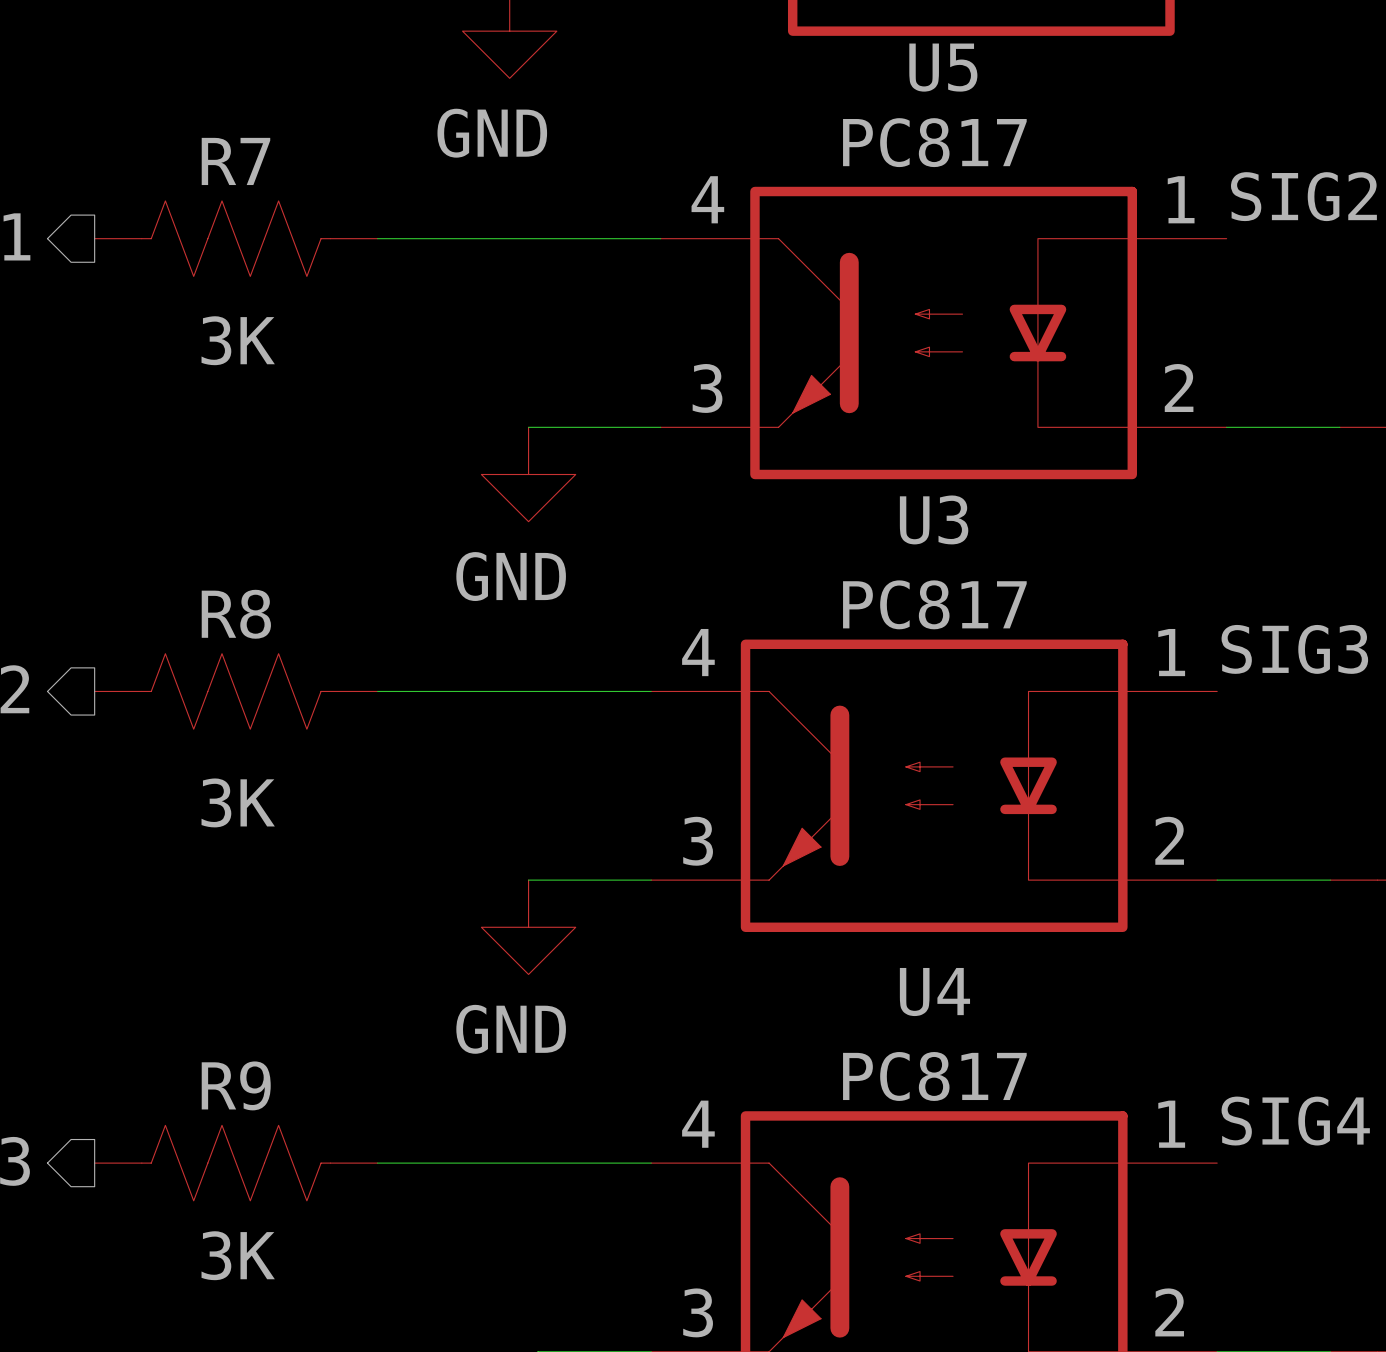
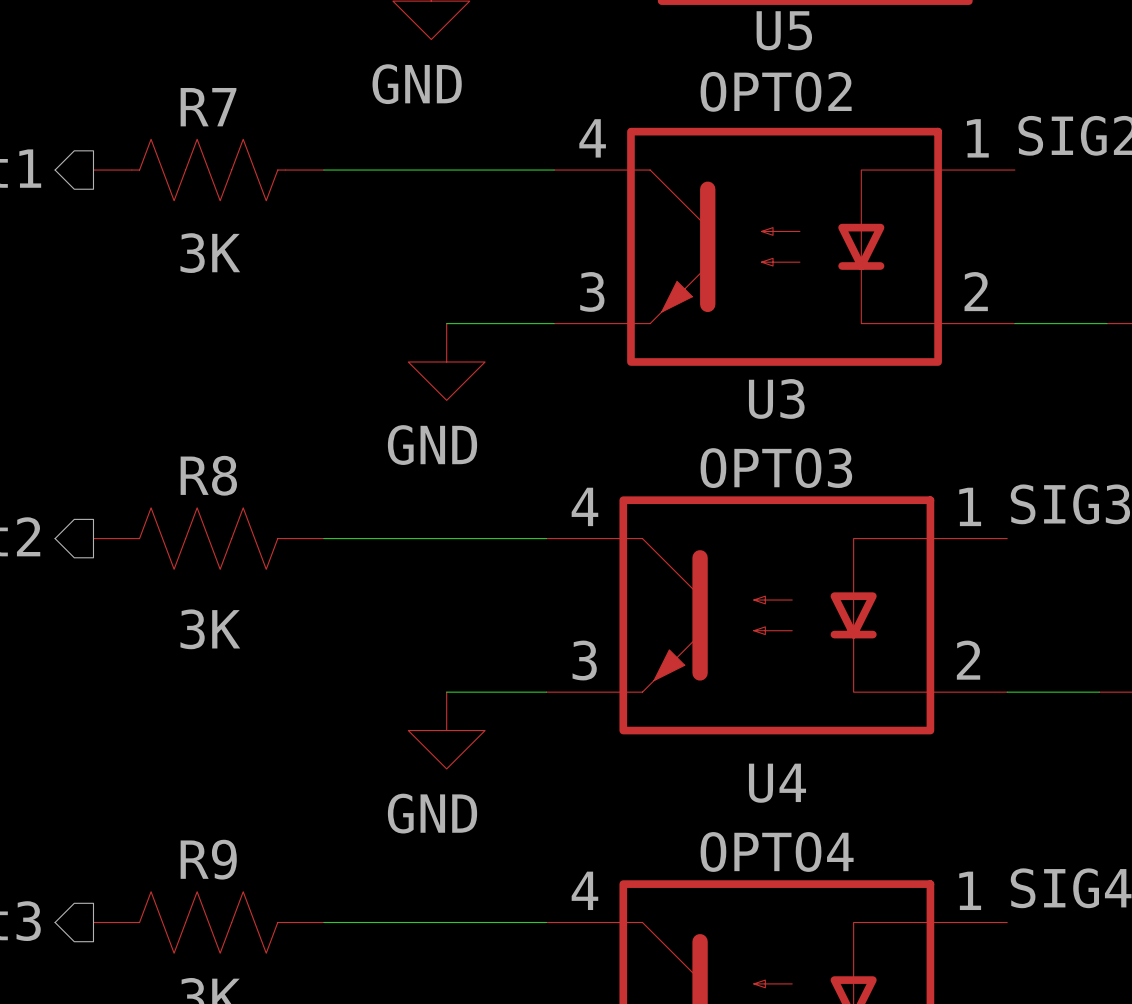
U5 value: PC817 (934, 142) -> OPTO2 (776, 91)
U3 value: PC817 (934, 604) -> OPTO3 (776, 468)
U4 value: PC817 (934, 1076) -> OPTO4 (777, 851)

